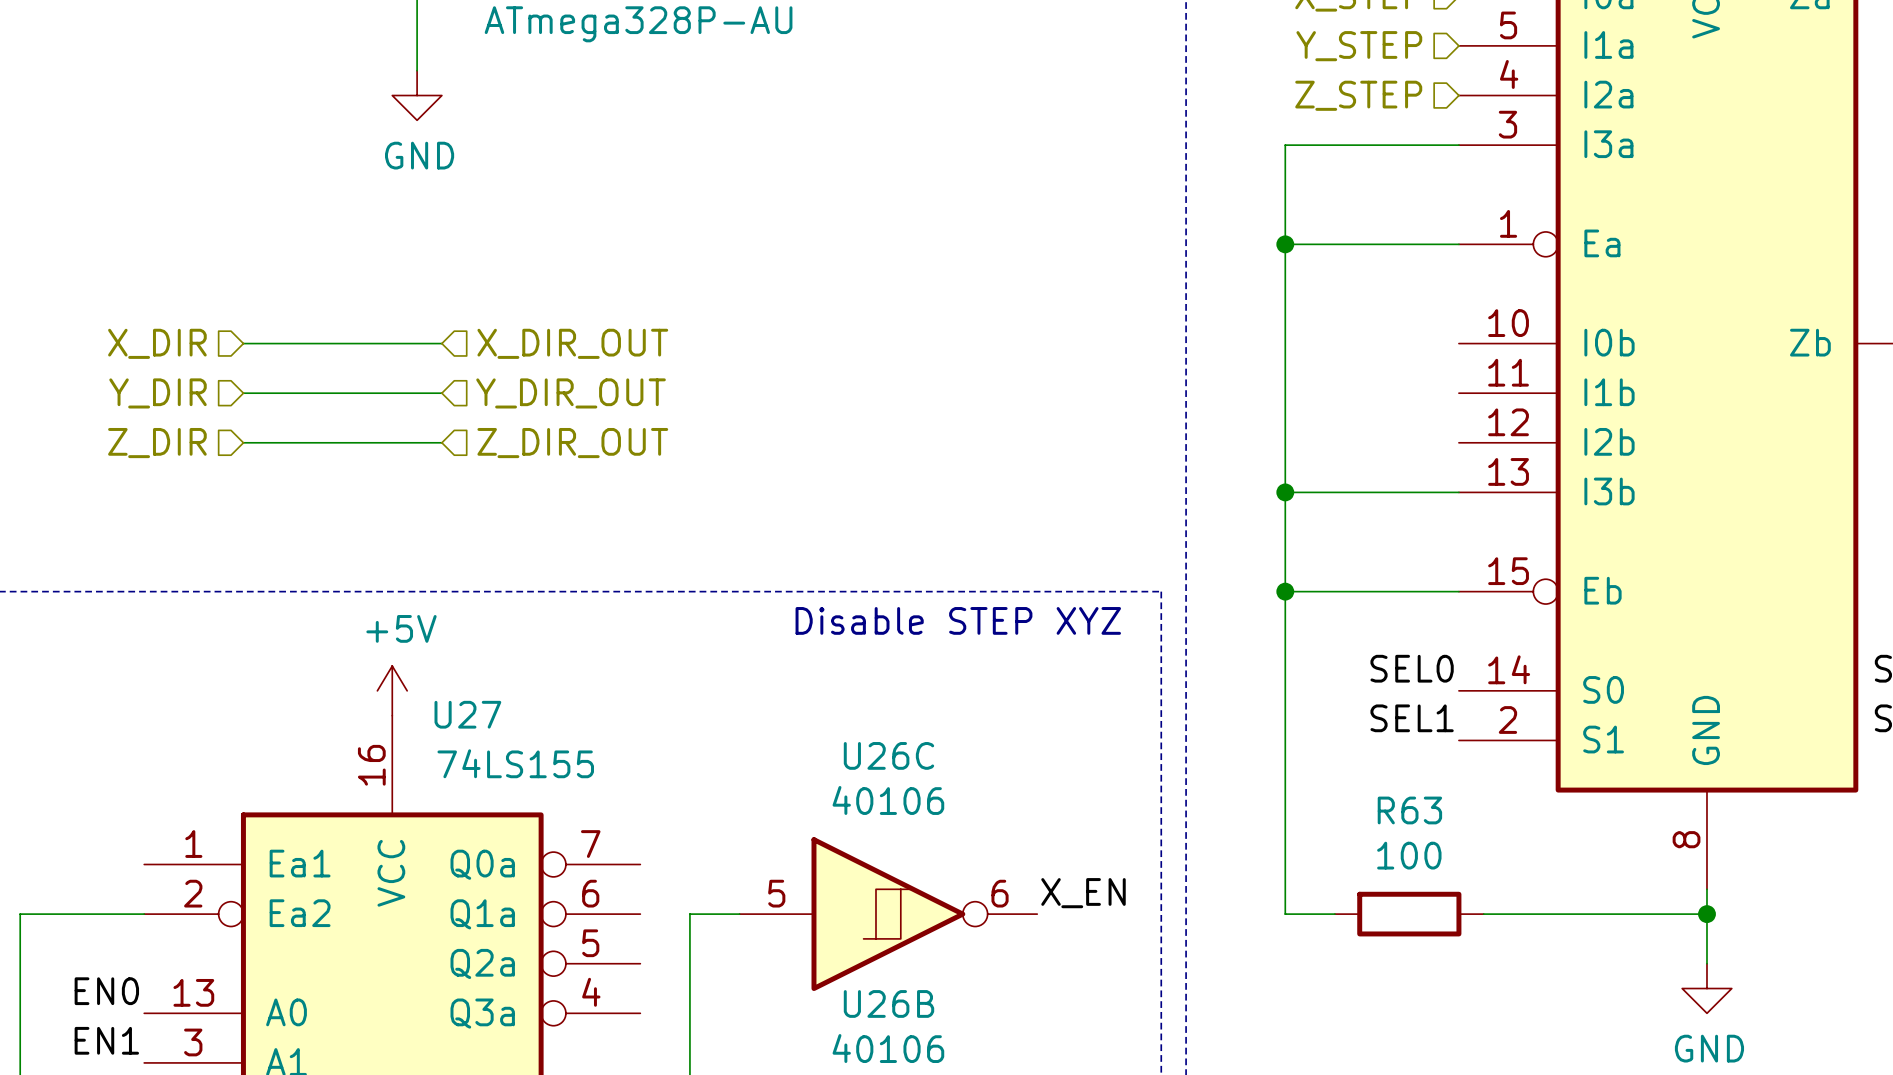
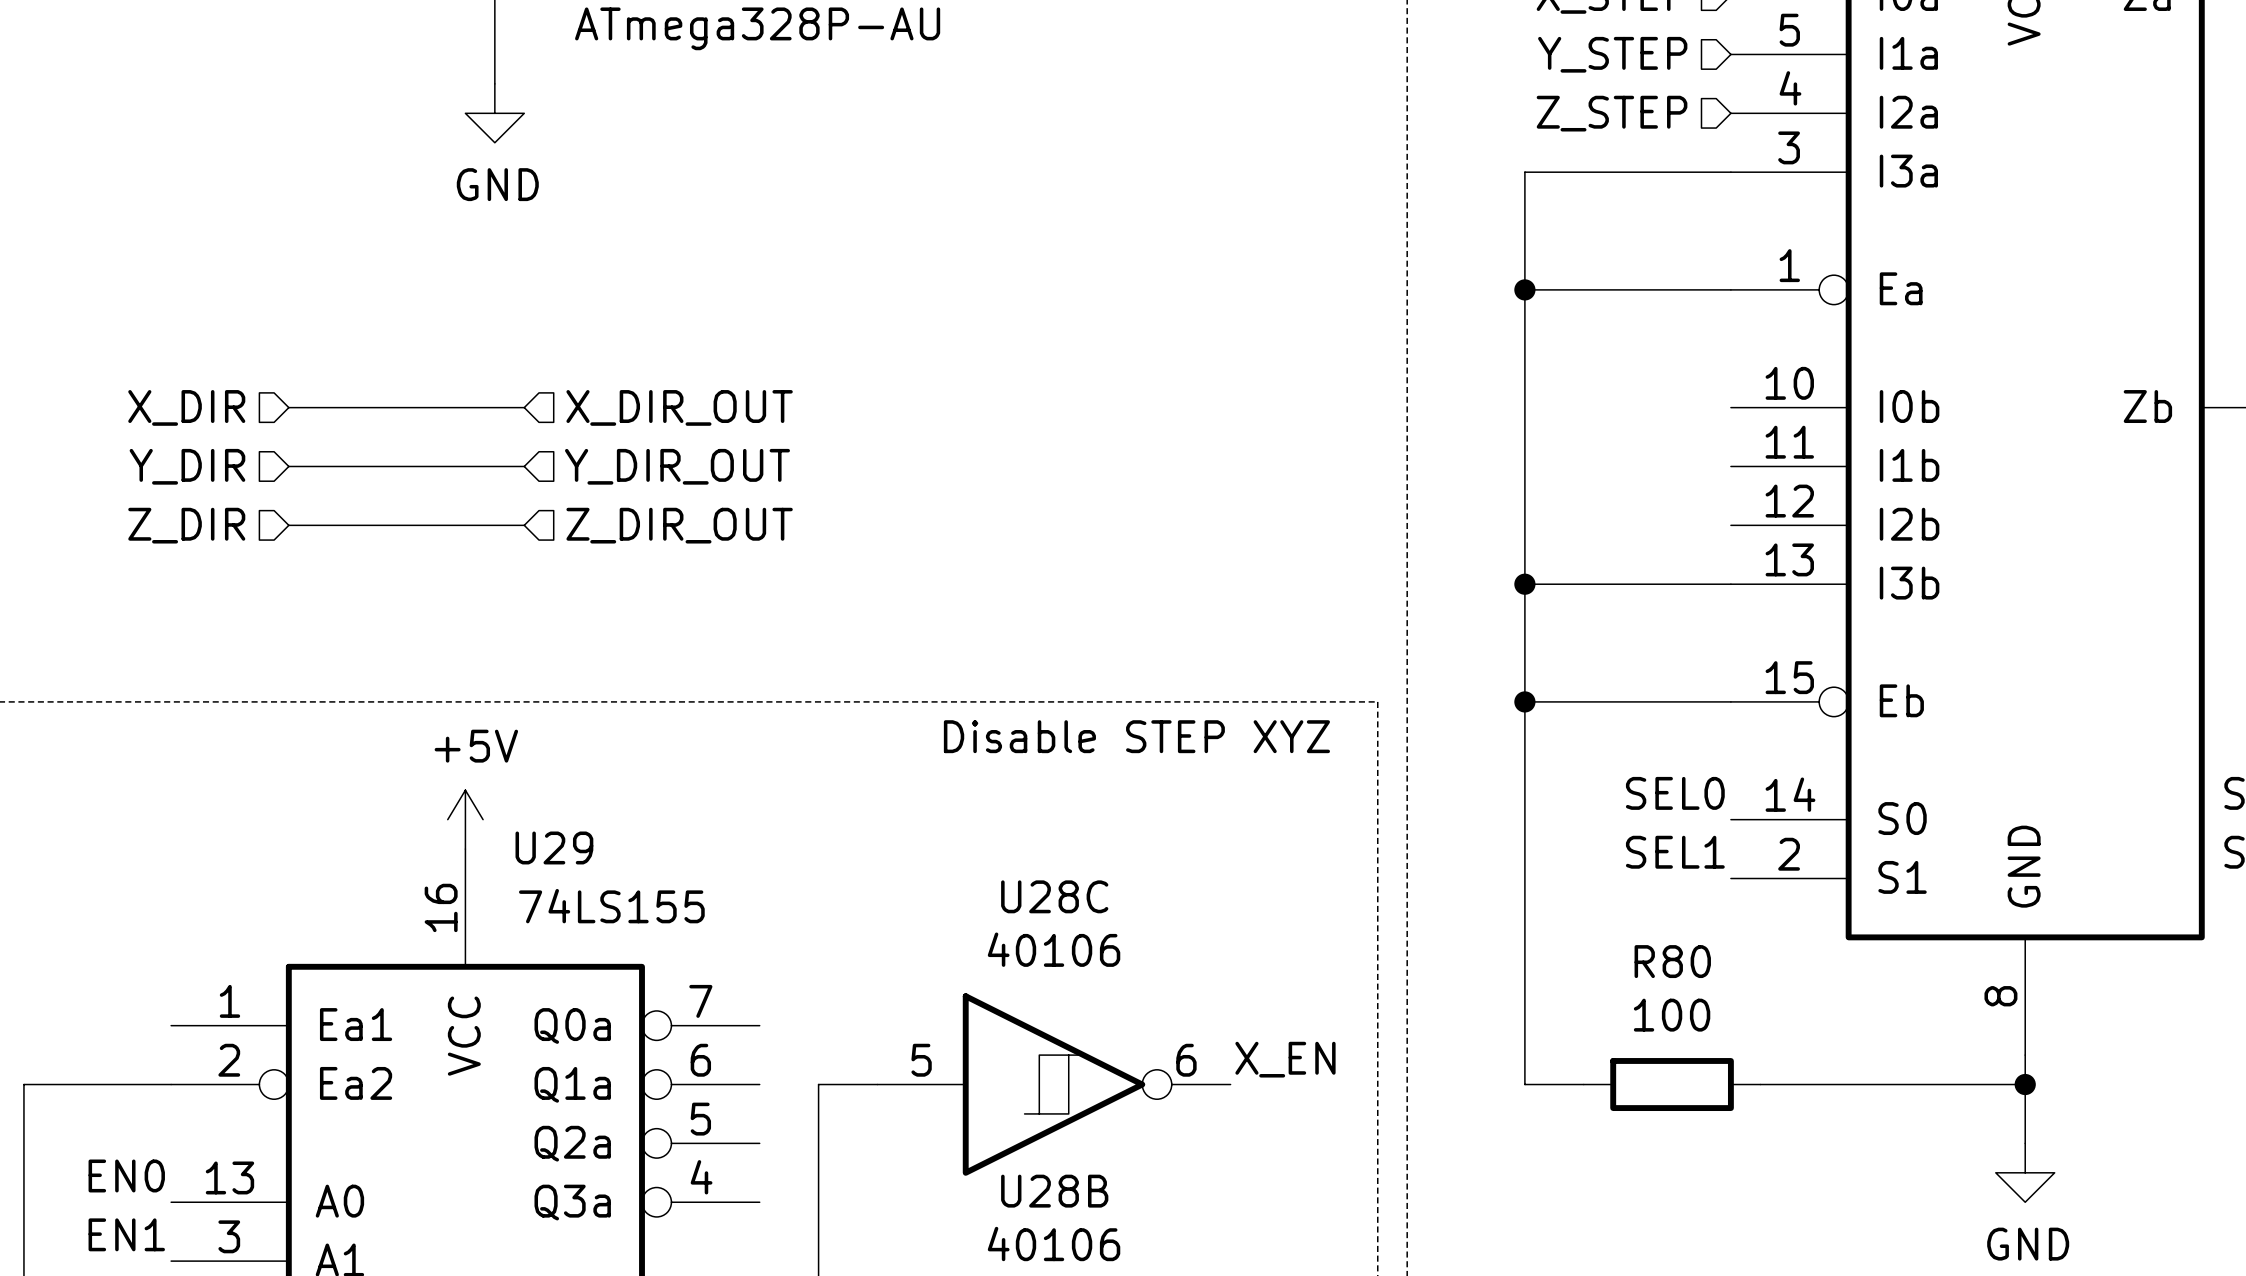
U27 name: U27 (467, 714) -> U29 (554, 847)
U26C name: U26C (888, 755) -> U28C (1054, 896)
R63 name: R63 (1409, 810) -> R80 (1672, 961)
U26B name: U26B (888, 1003) -> U28B (1054, 1191)

